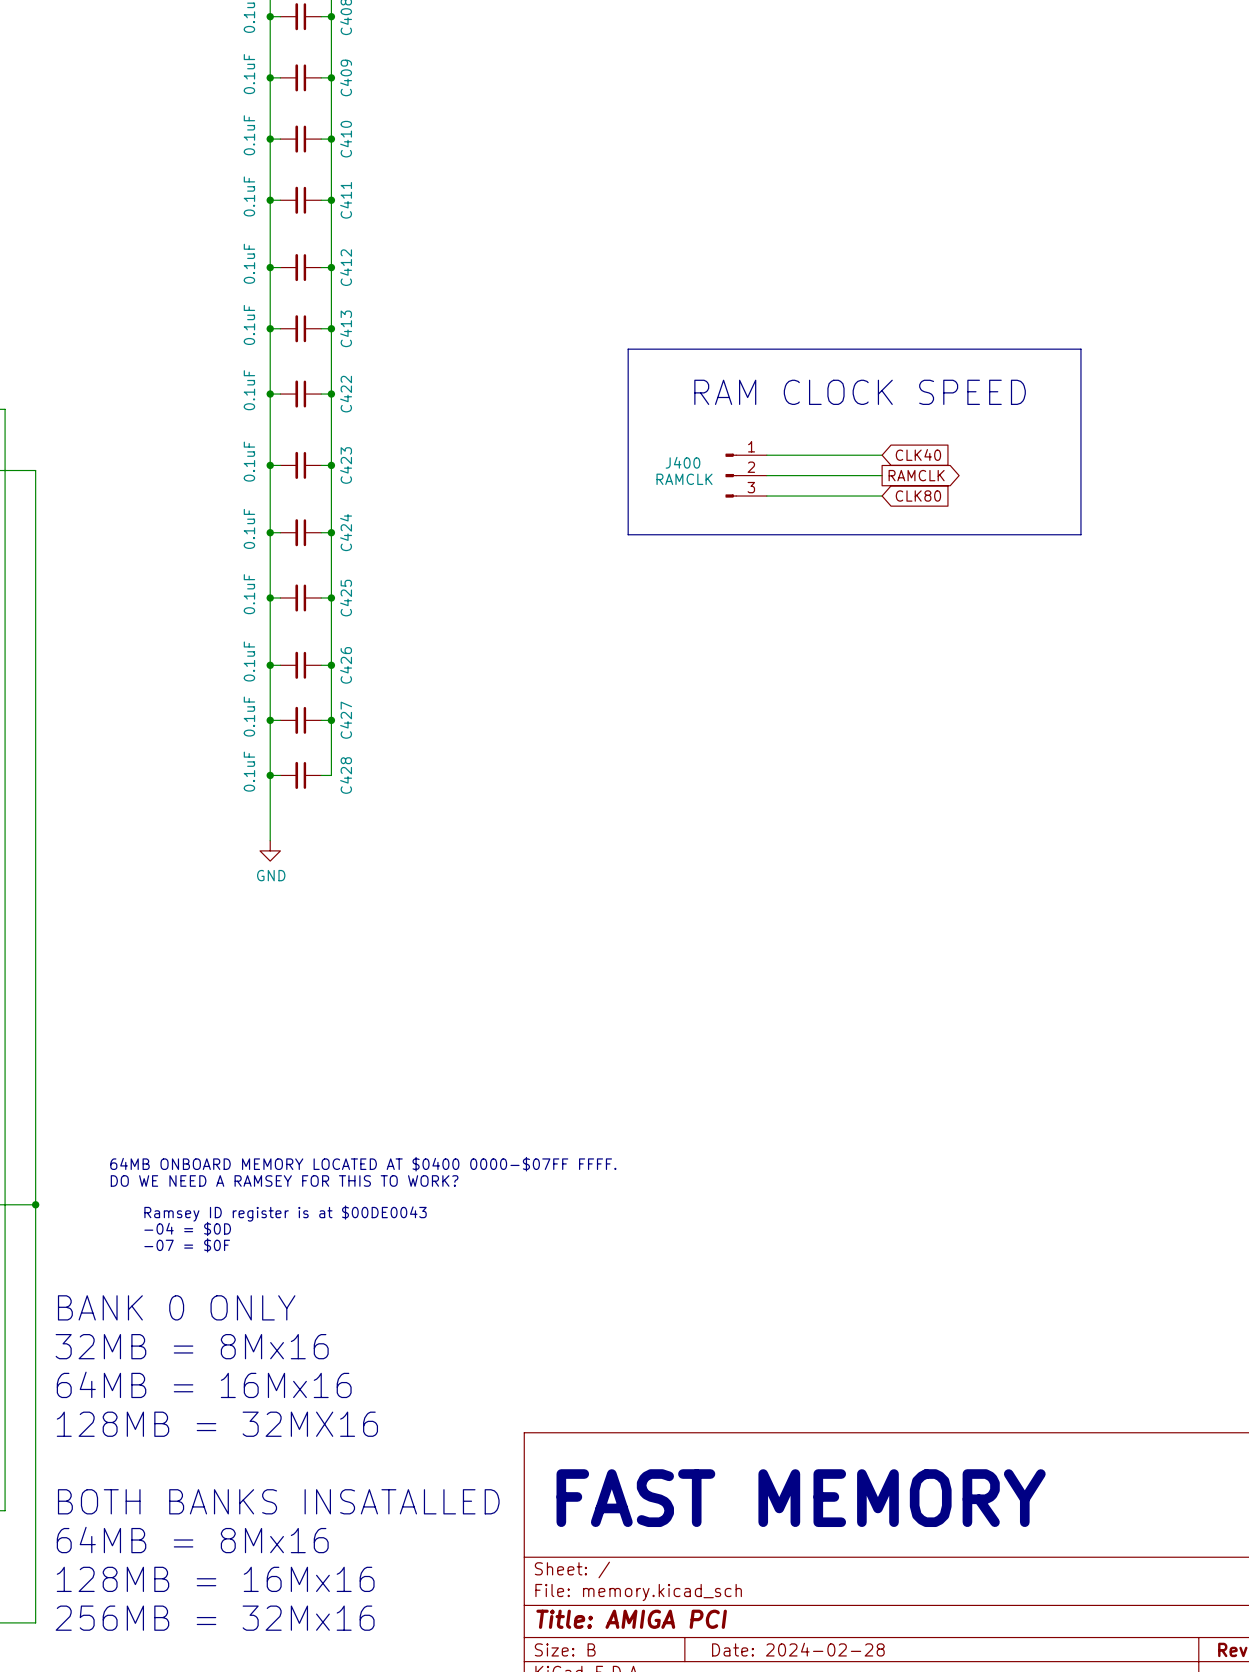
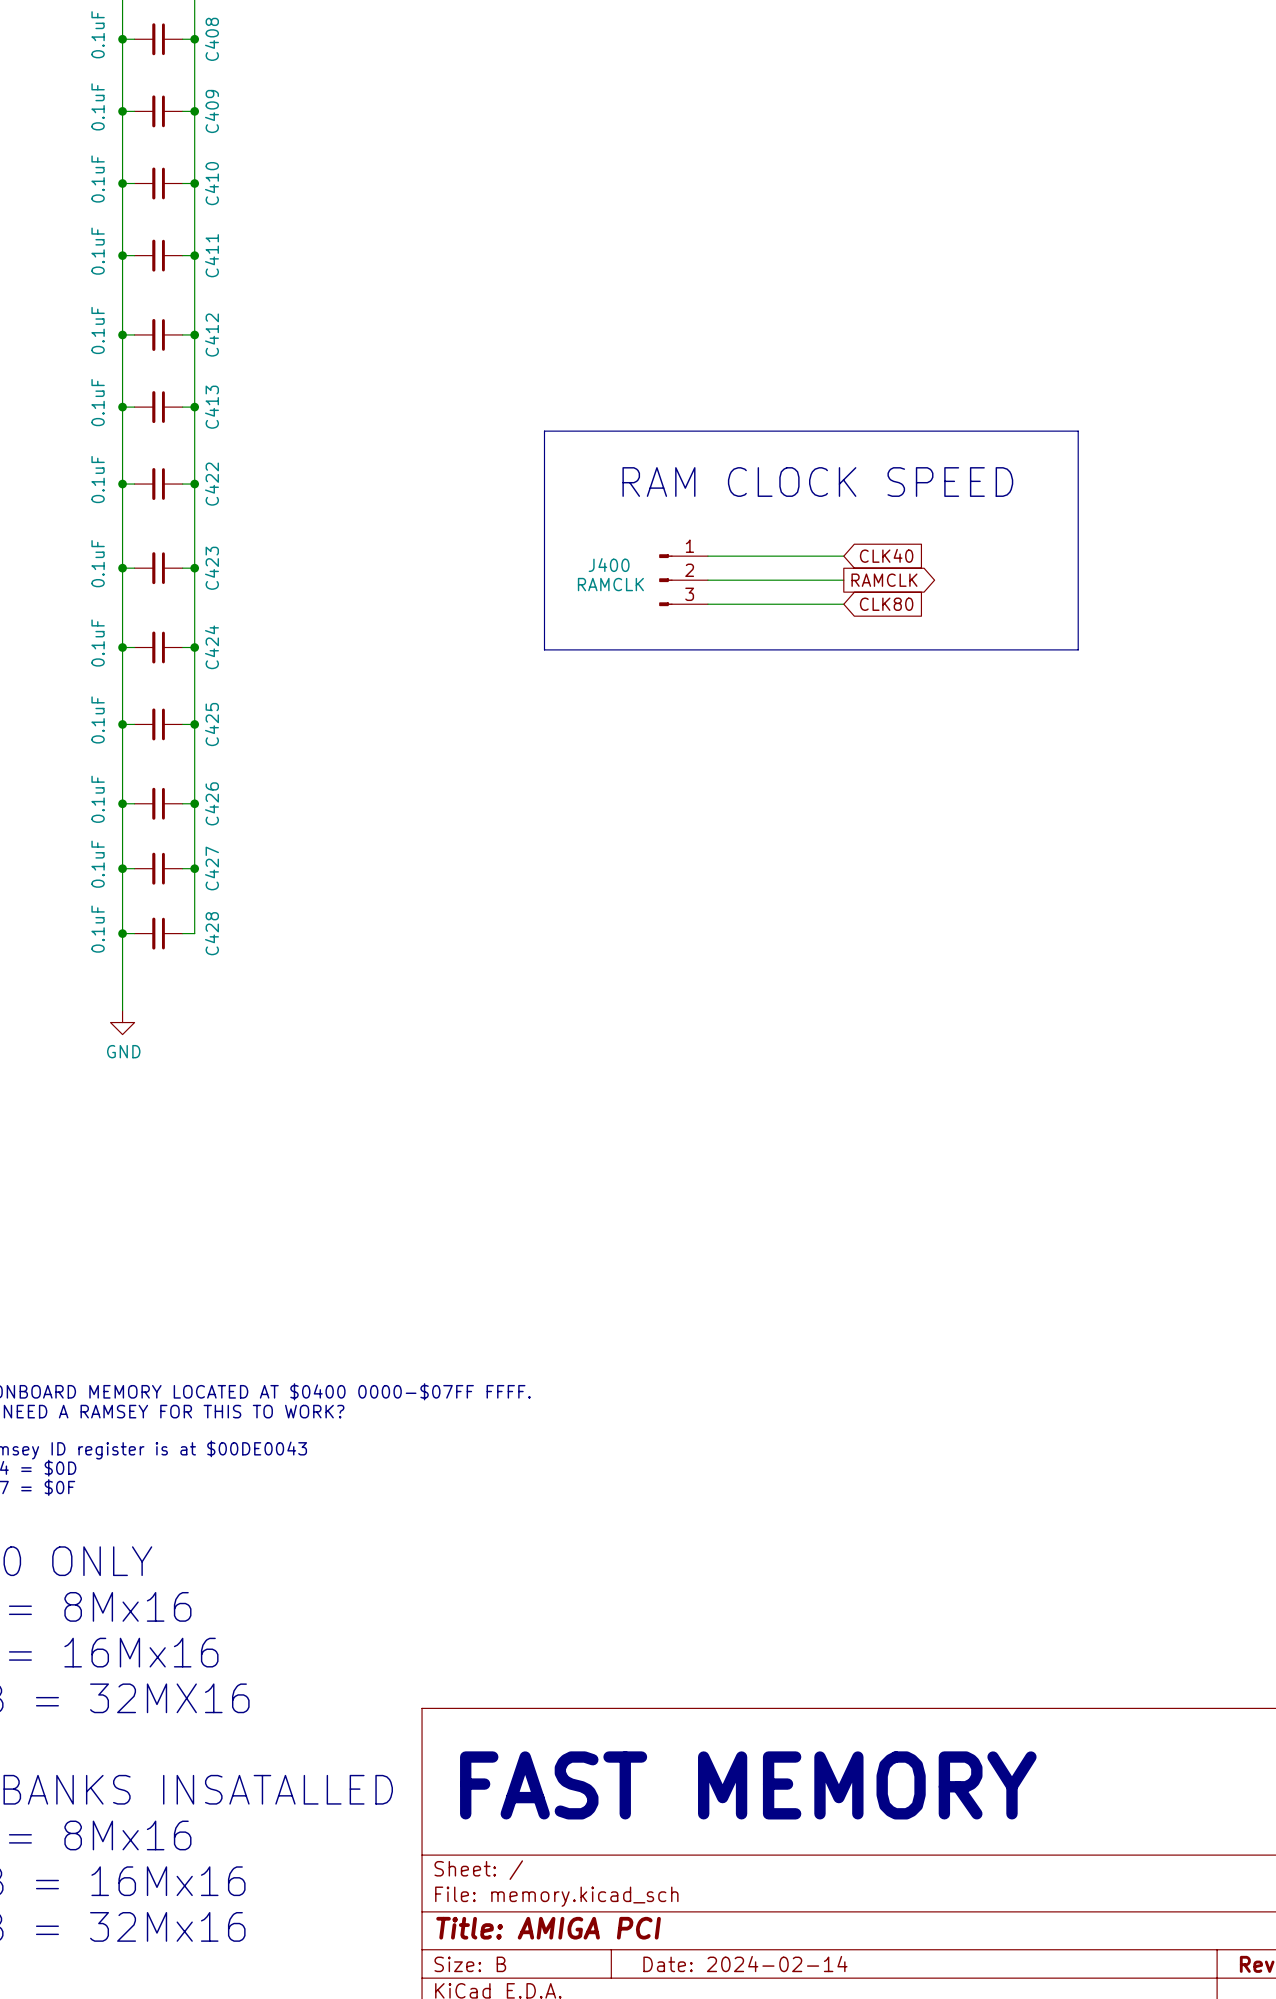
title block: Date: 2024-02-28 (798, 1649) -> Date: 2024-02-14 (745, 1964)

